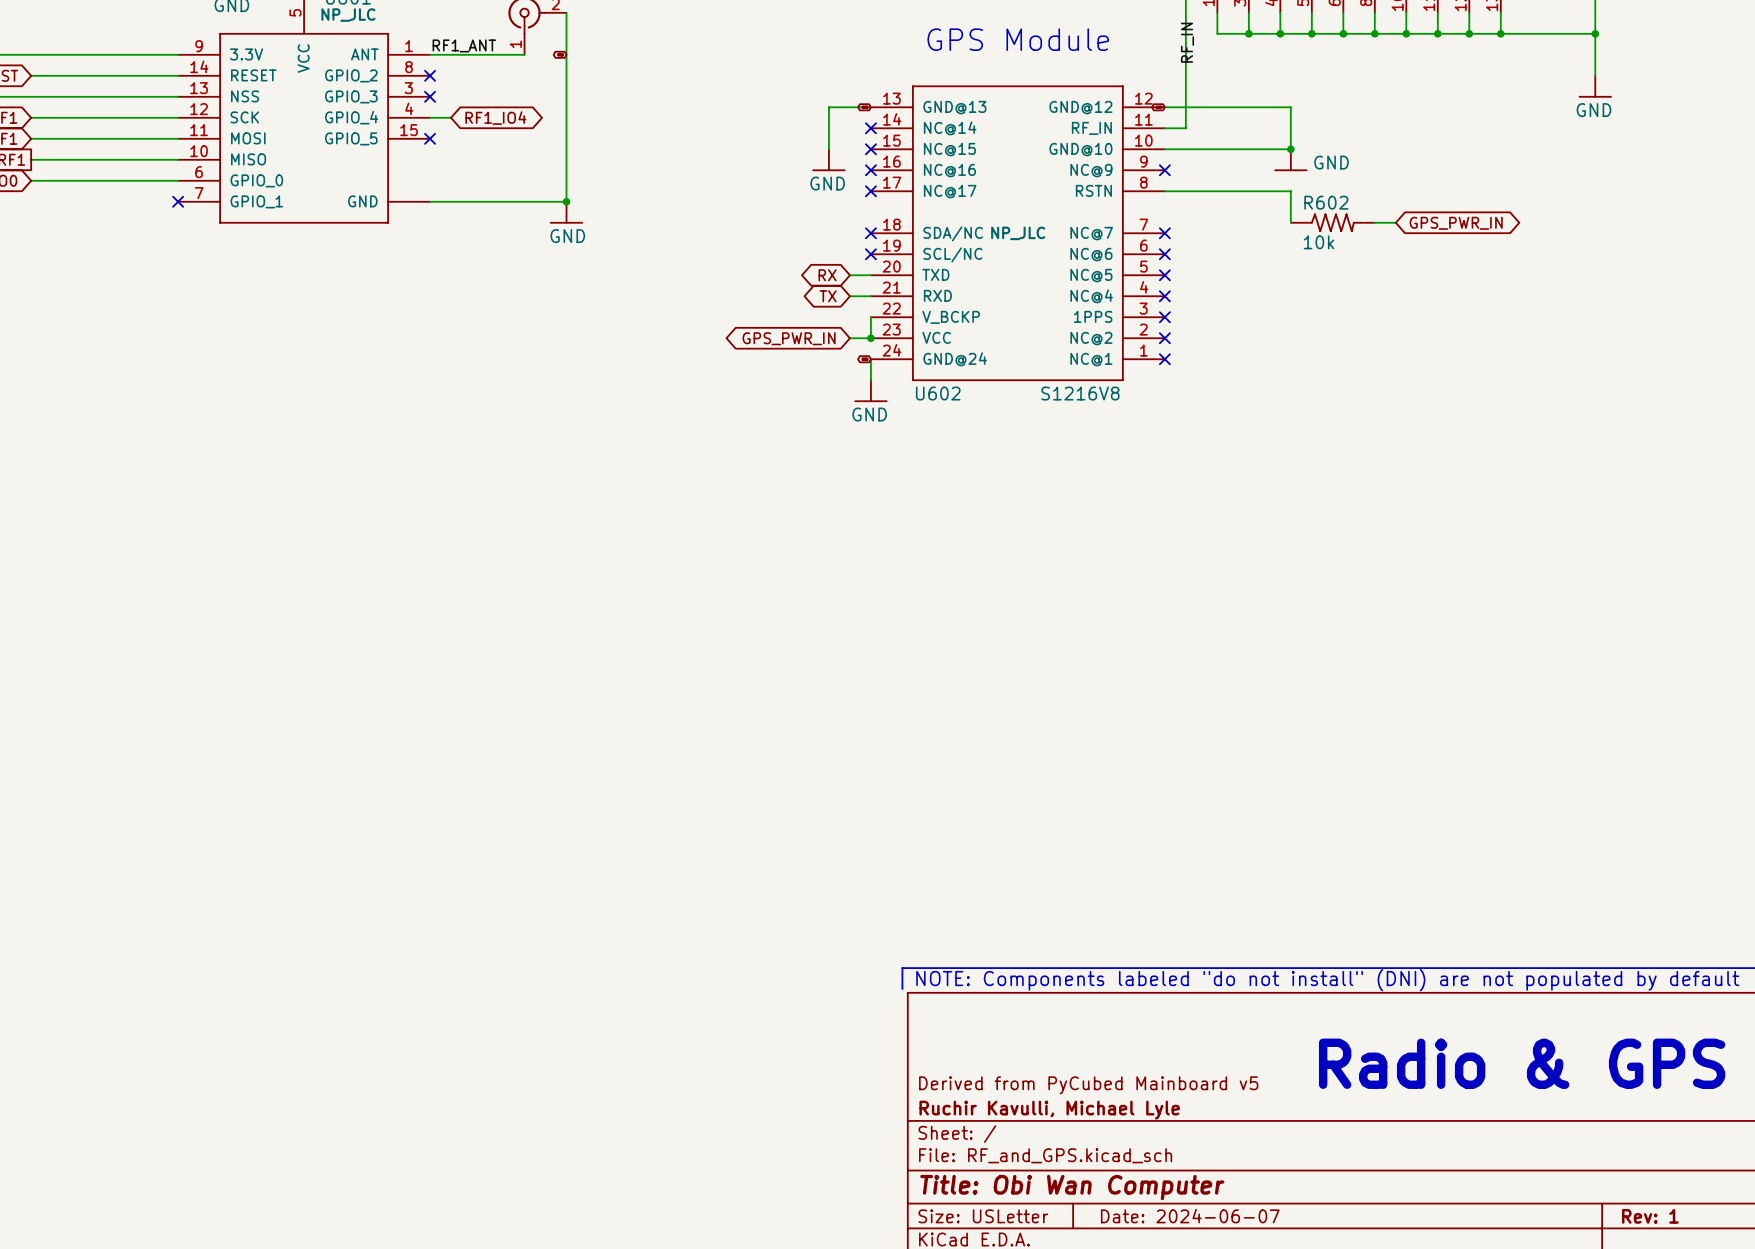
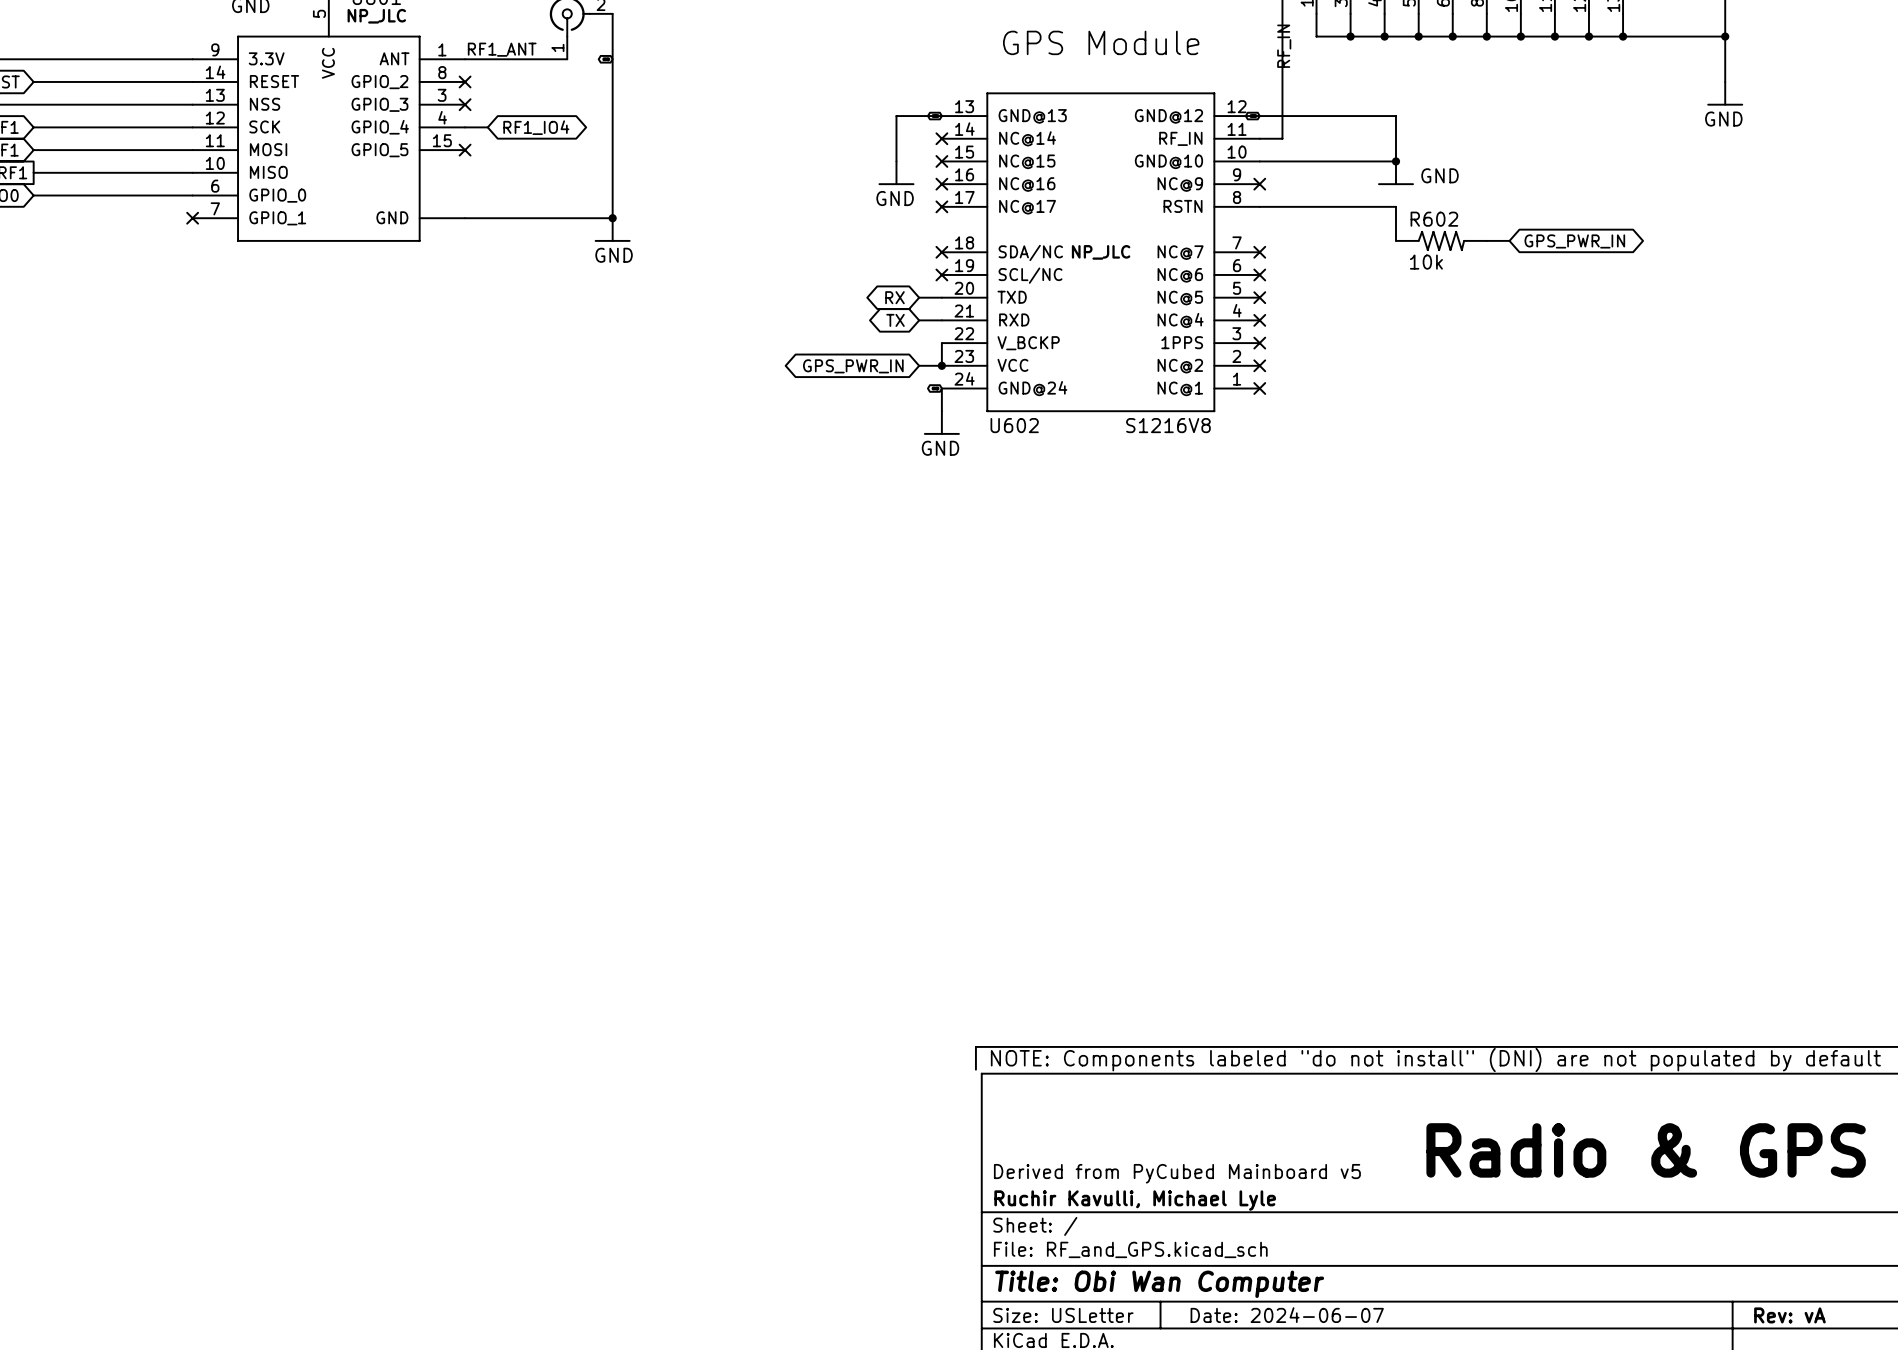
title block: Rev: 1 (1650, 1216) -> Rev: vA (1789, 1315)

